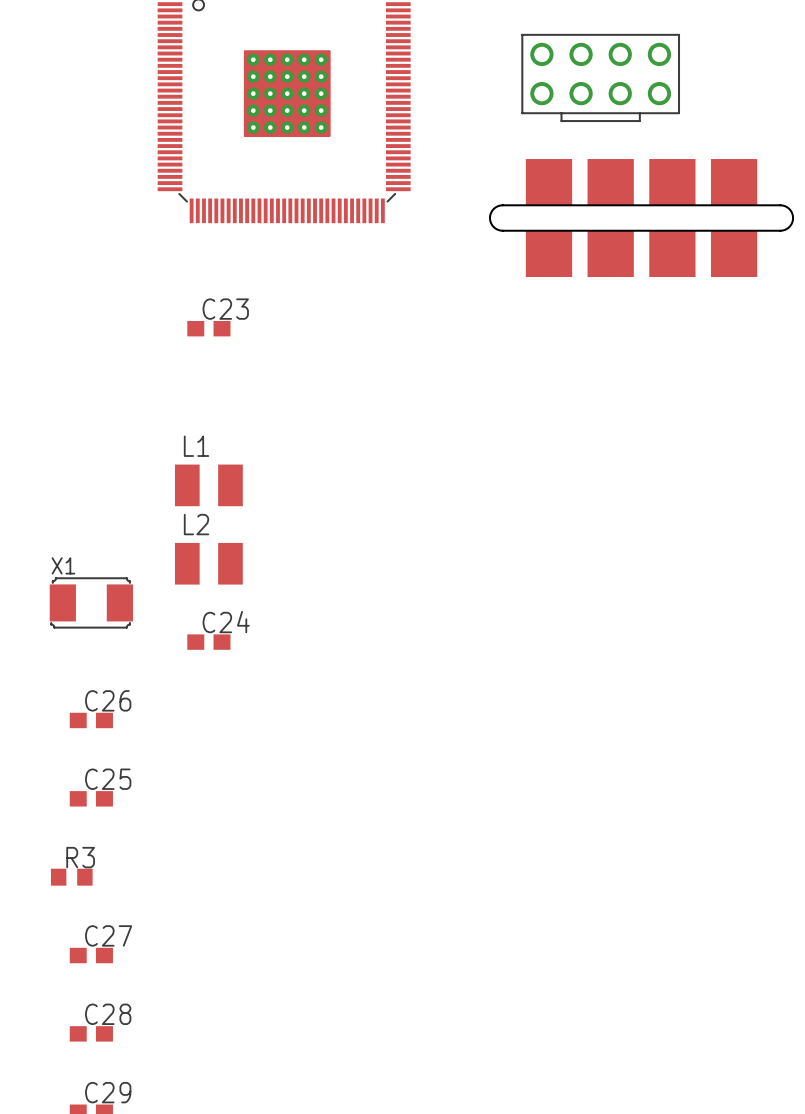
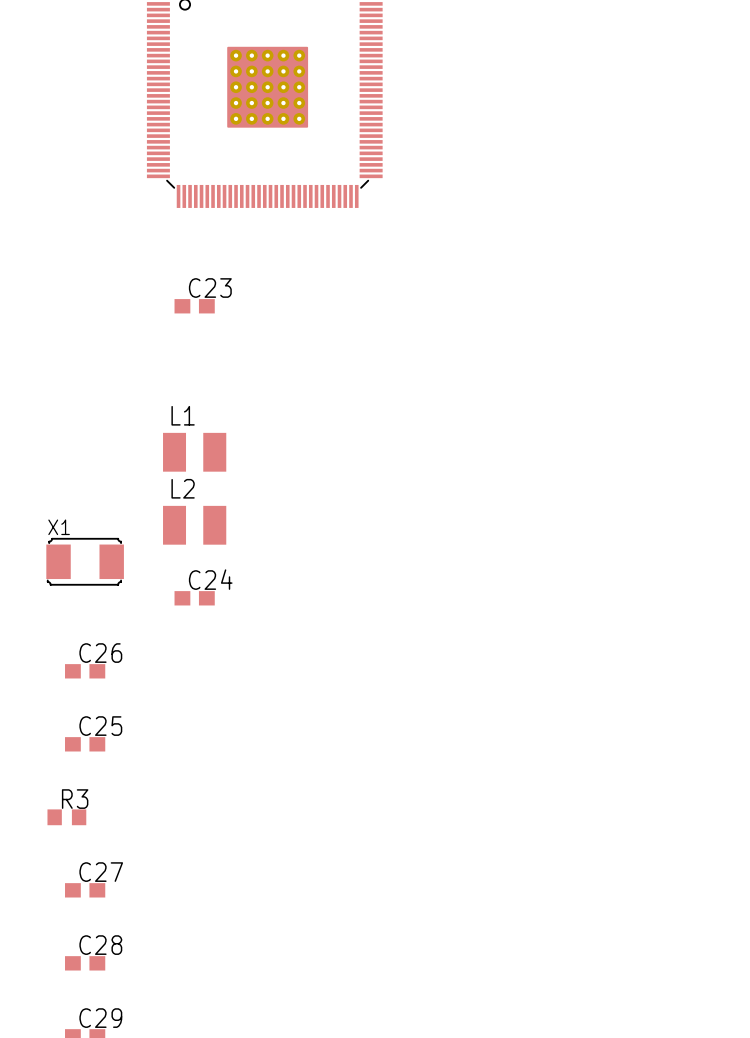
part: (600, 77) -> none
part: (641, 218) -> none

